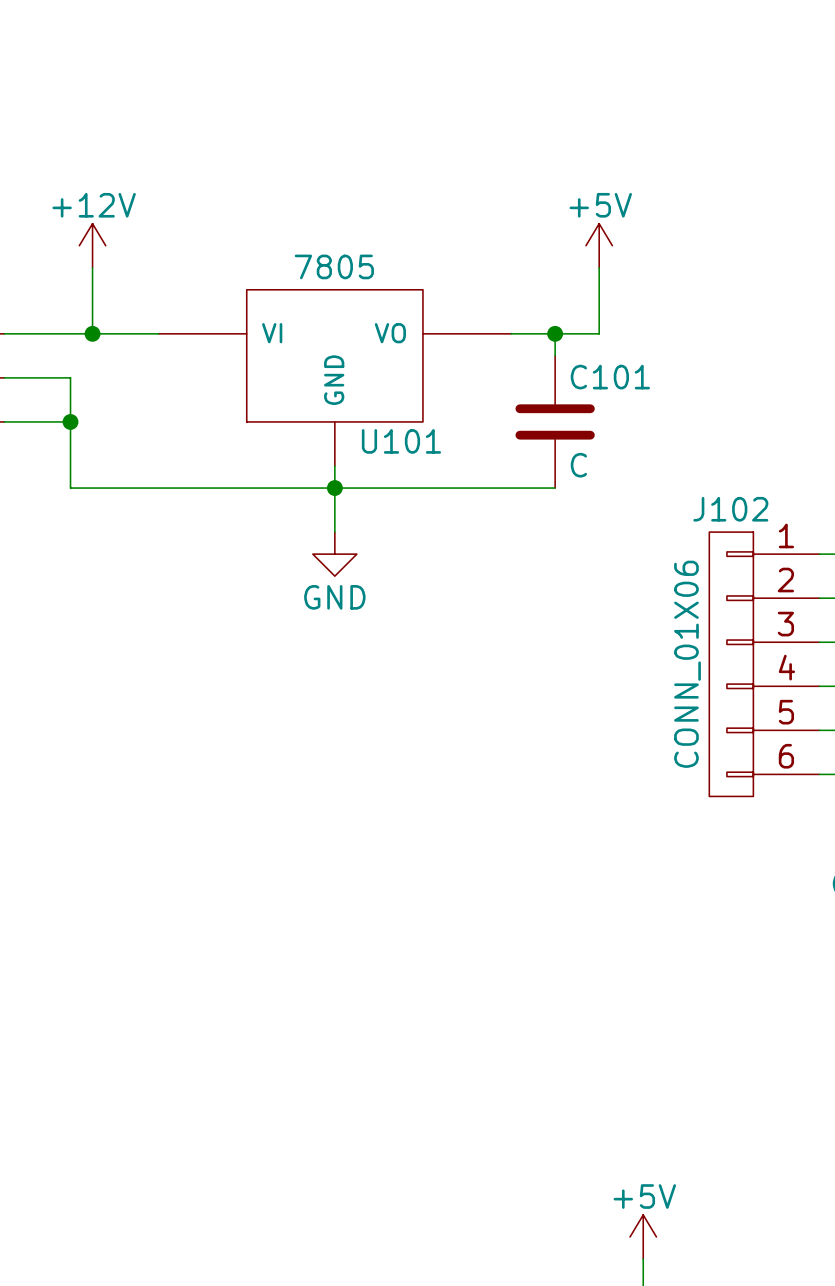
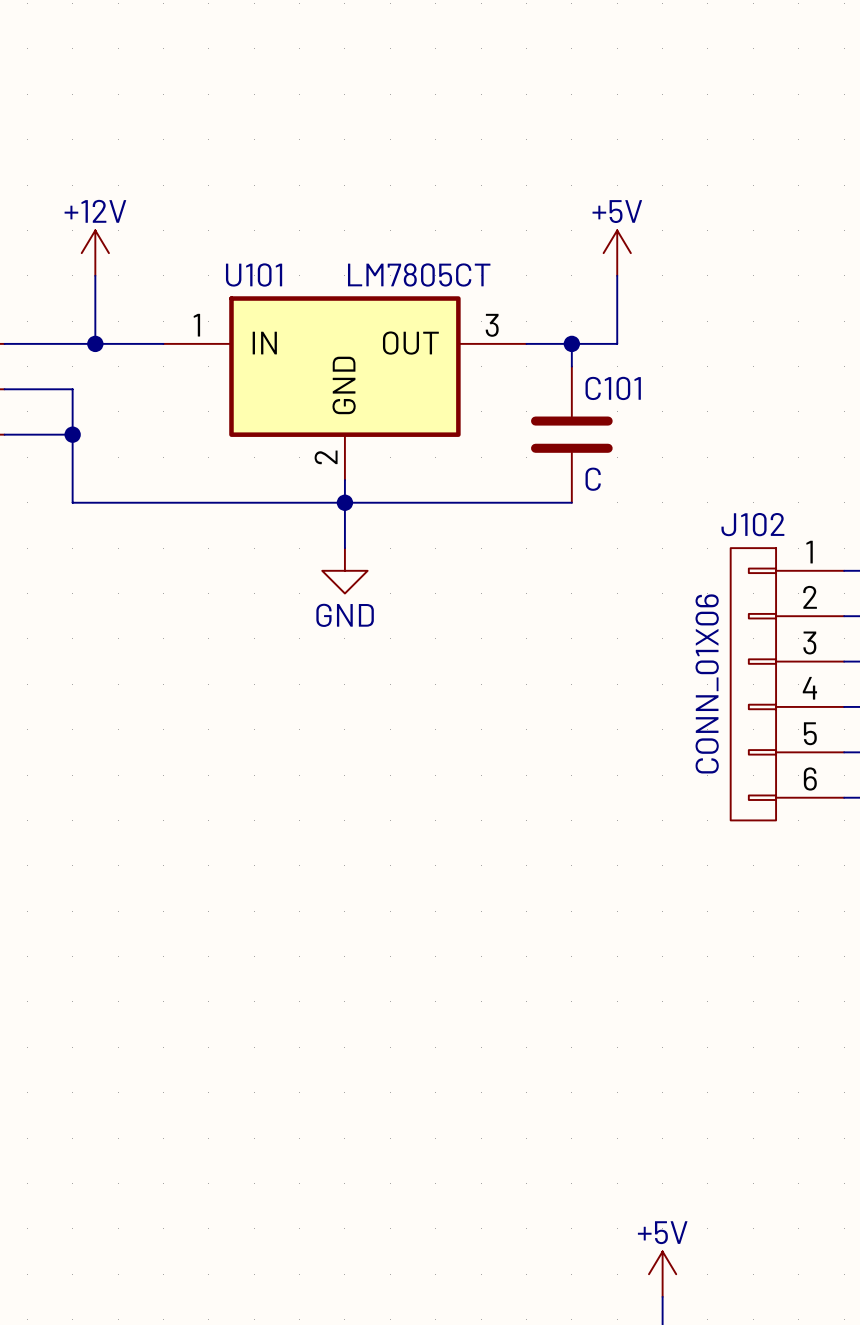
U101 value: 7805 (334, 266) -> LM7805CT (419, 274)
U101 symbol: [158, 289, 512, 467] -> [163, 296, 527, 481]
U101 name position: U101 (401, 441) -> U101 (254, 275)

